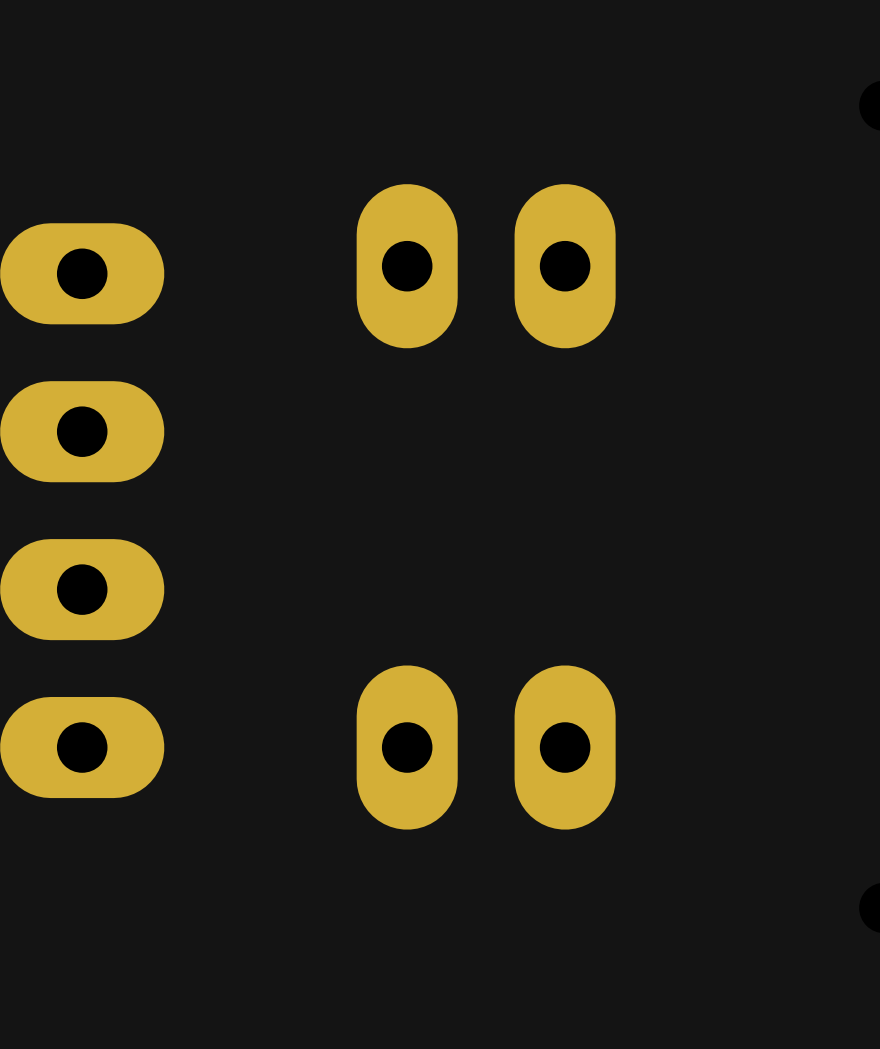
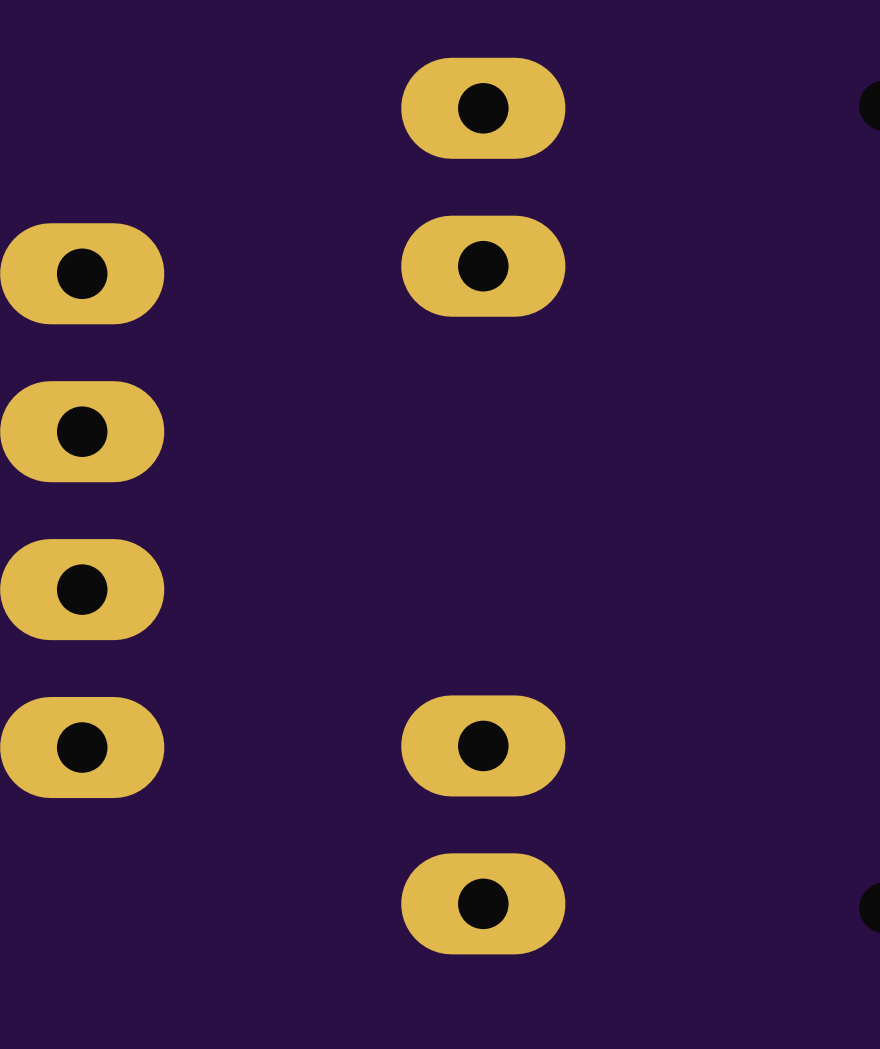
part rotation: 0° (486, 266) -> 90° clockwise (483, 187)
part rotation: 0° (486, 747) -> 90° clockwise (483, 824)

